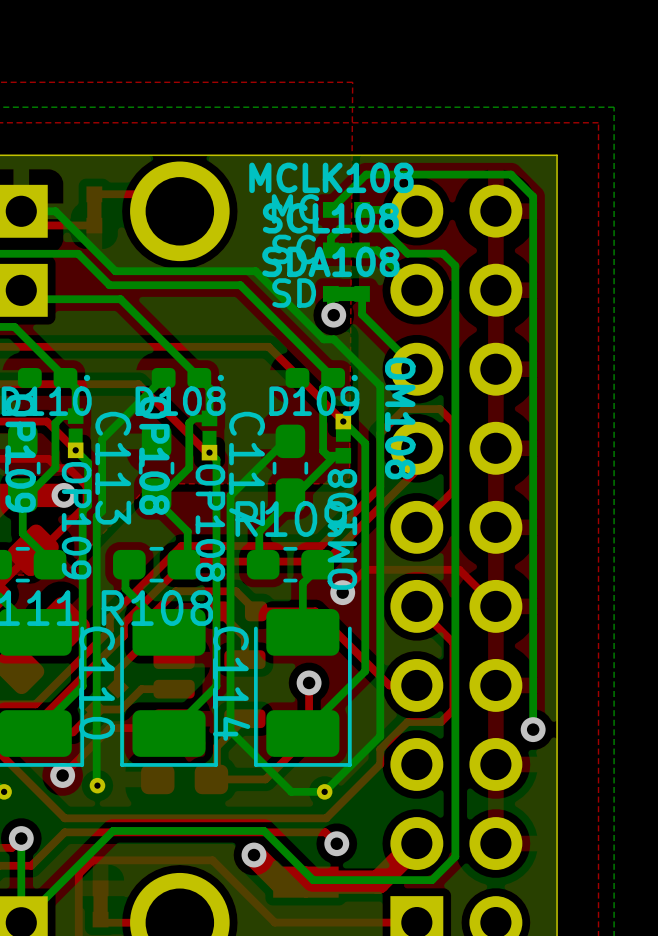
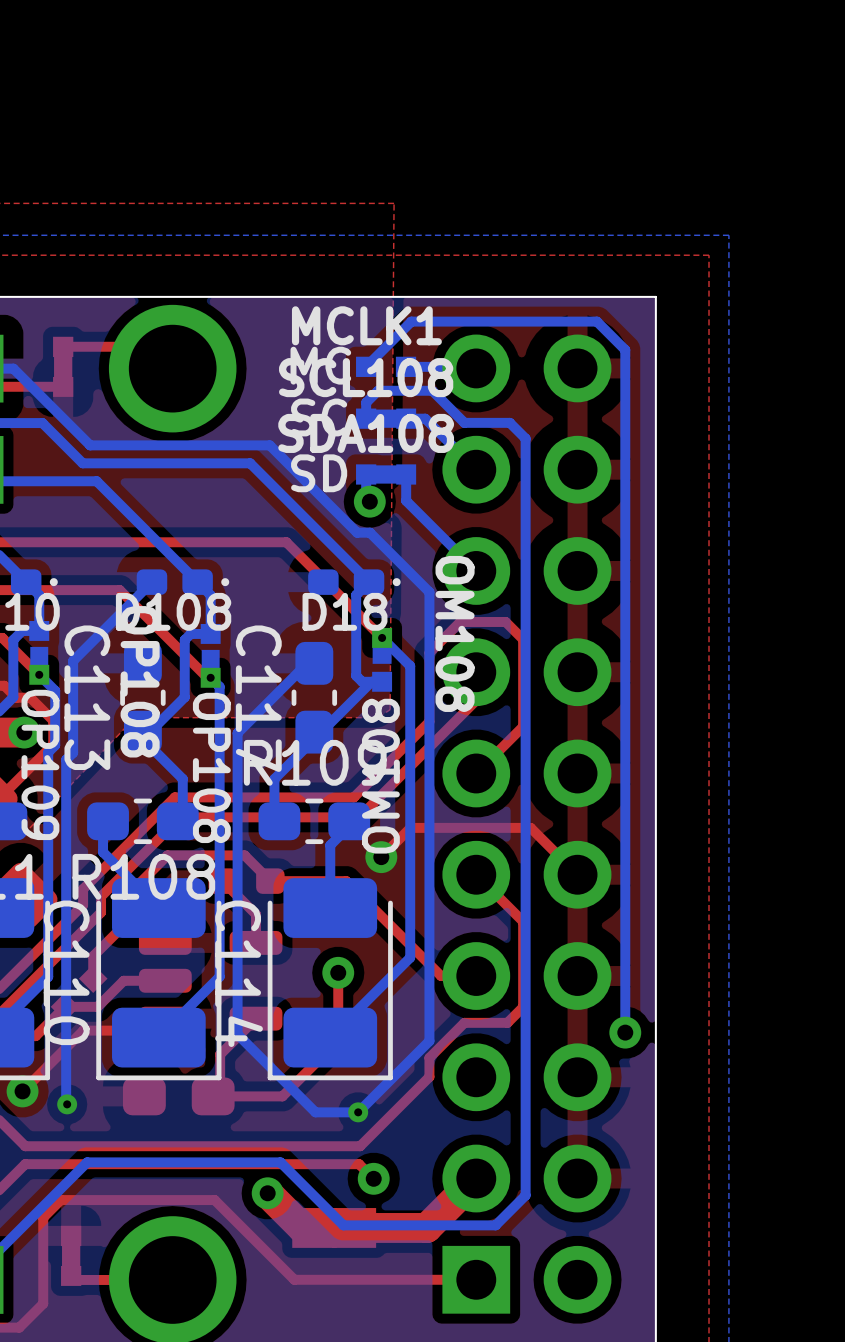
MCLK108 name: MCLK108 (331, 177) -> MCLK1 (366, 325)
D109 name: D109 (314, 401) -> D18 (344, 611)

